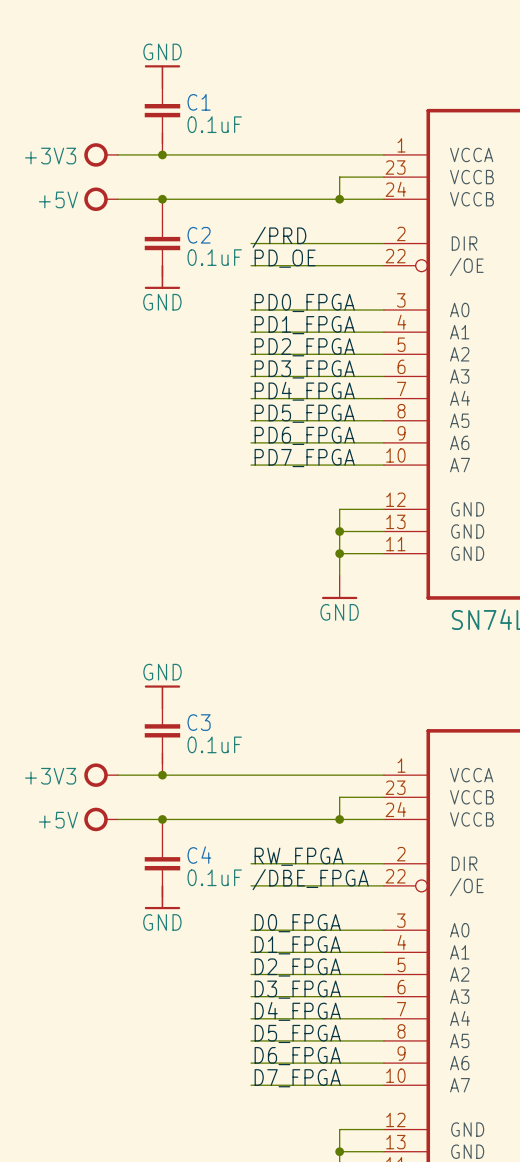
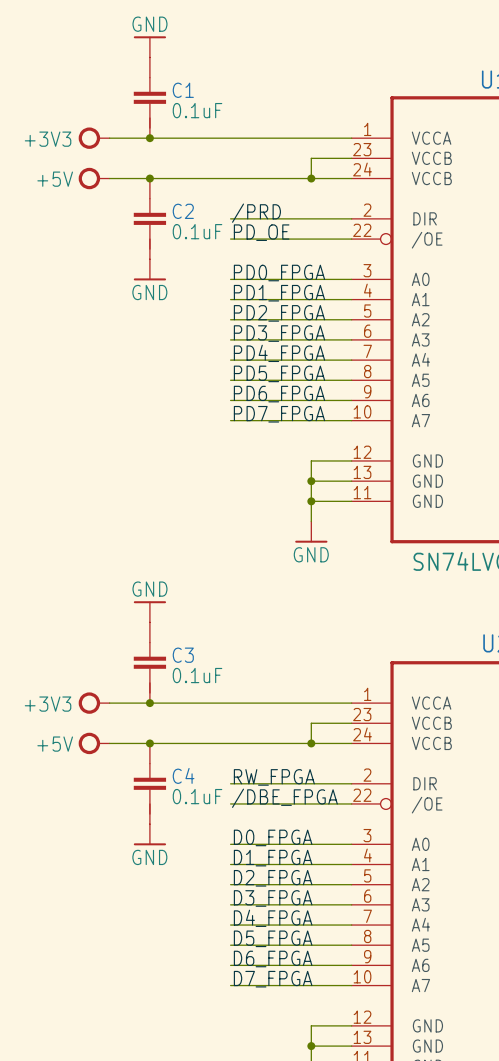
power symbol position: GND (162, 76) -> GND (149, 46)
power symbol position: GND (162, 277) -> GND (149, 269)
power symbol position: GND (162, 697) -> GND (149, 611)
power symbol position: GND (162, 897) -> GND (149, 834)

